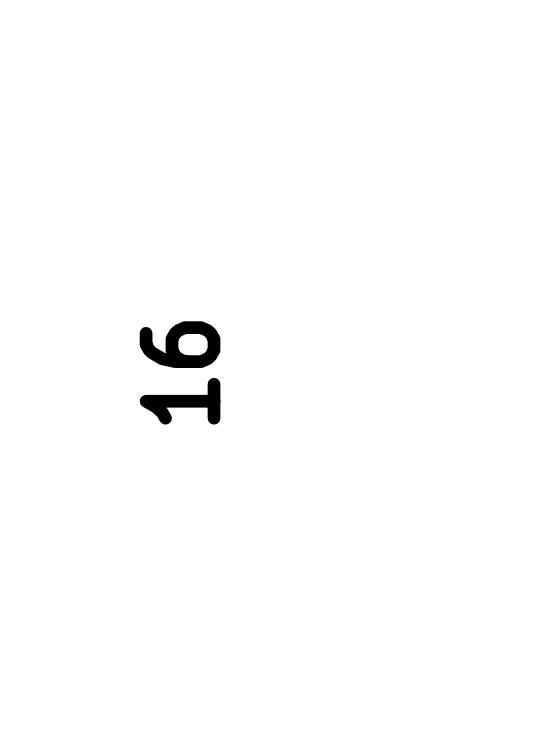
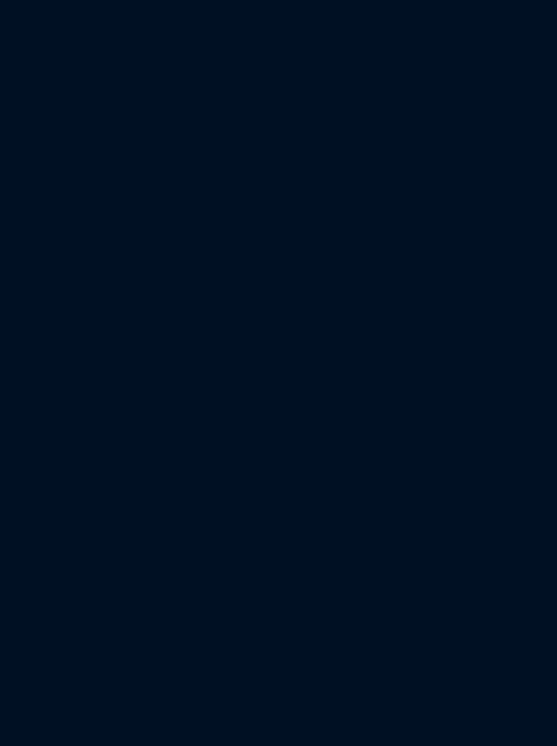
text: 16 (180, 372) -> none

